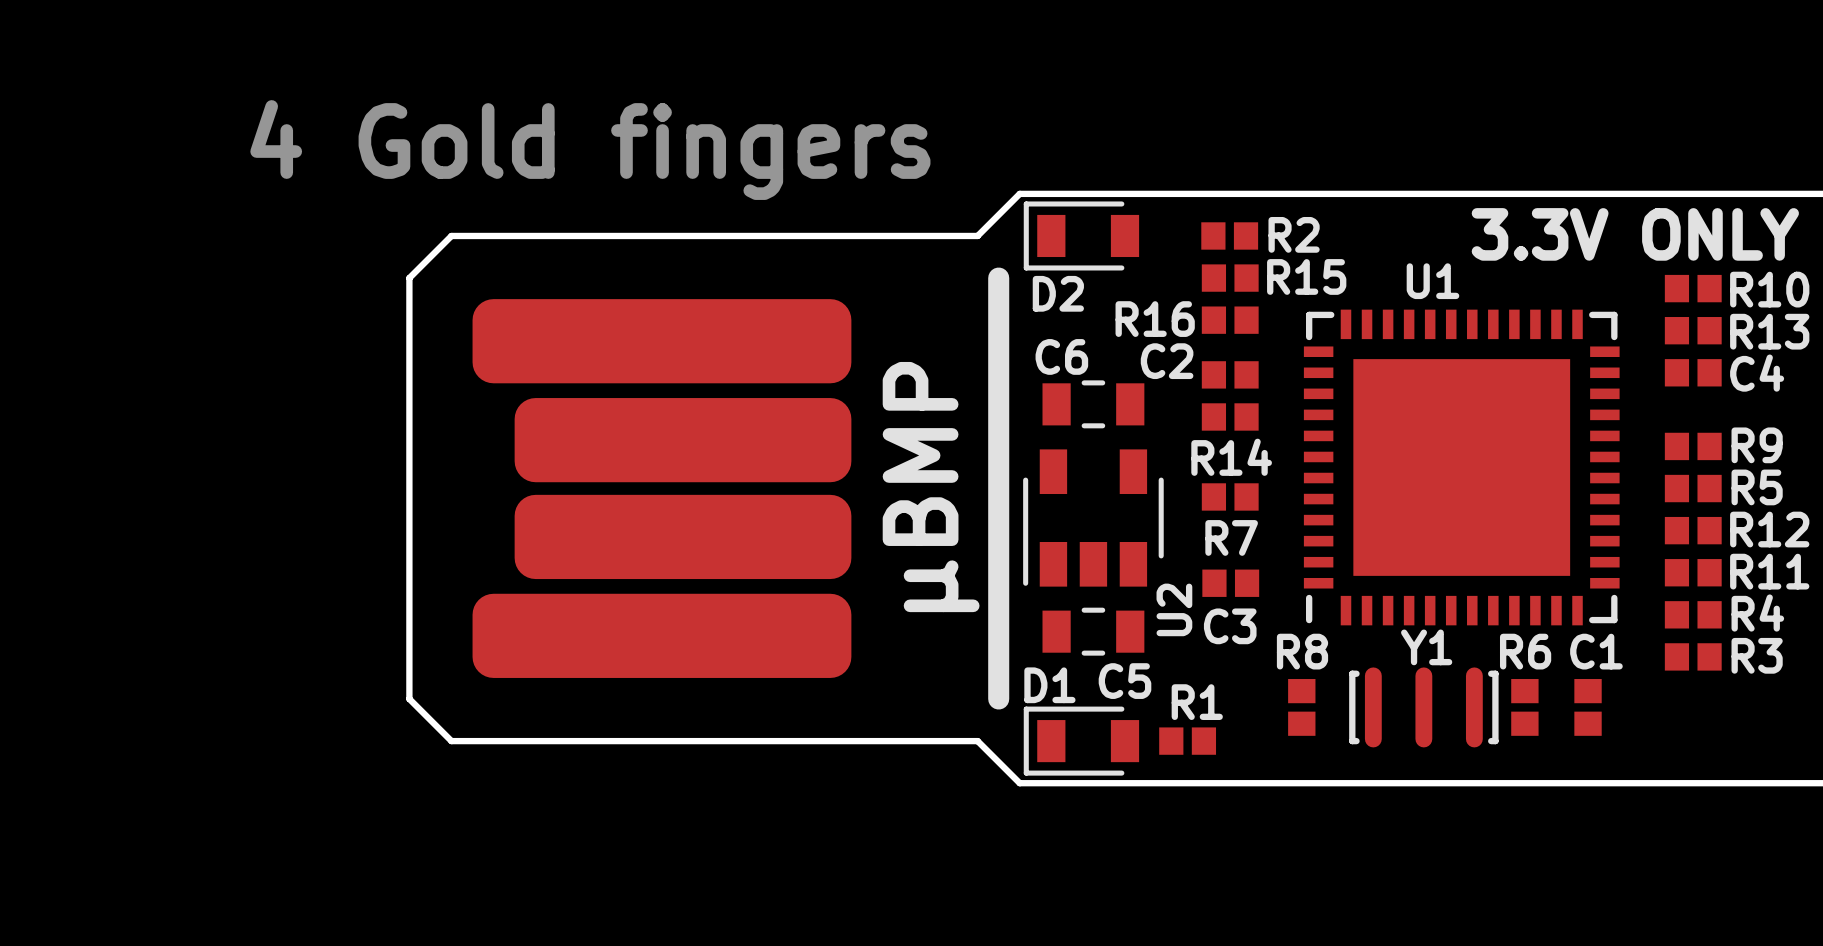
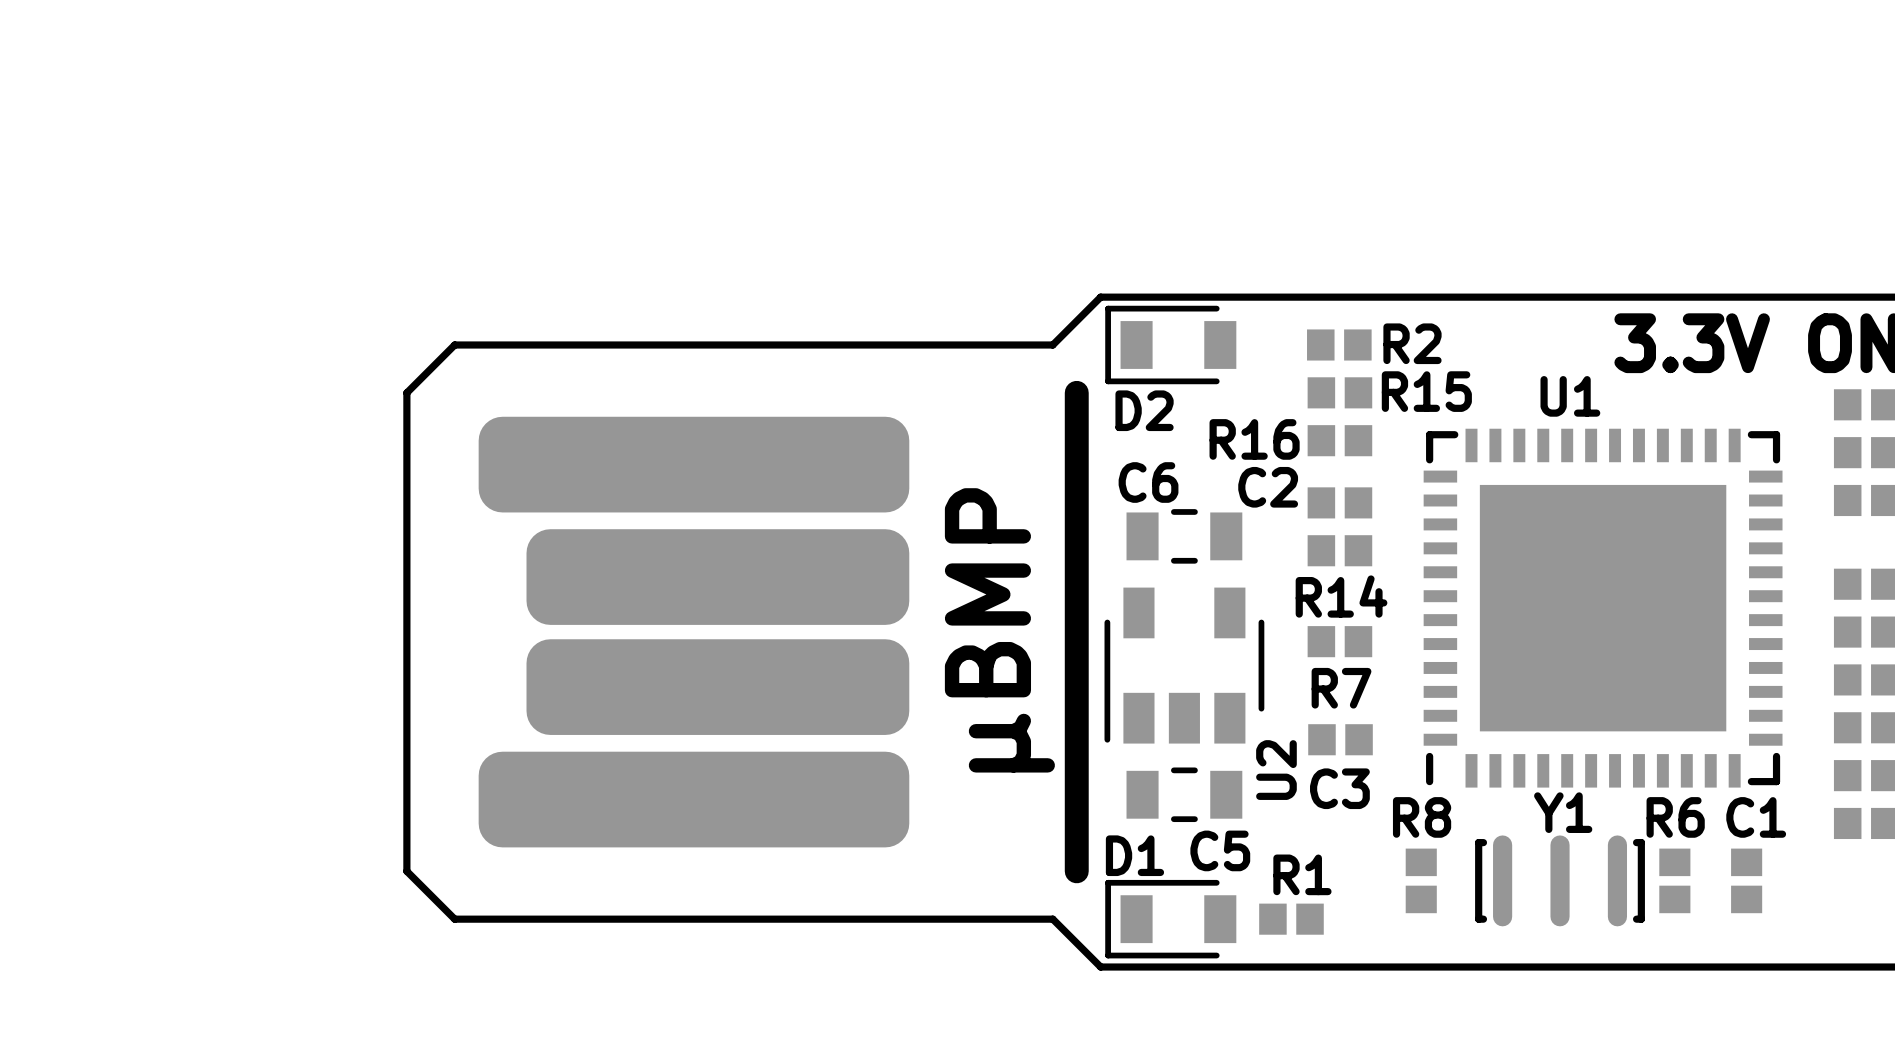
text: 4 Gold fingers (590, 150) -> none

